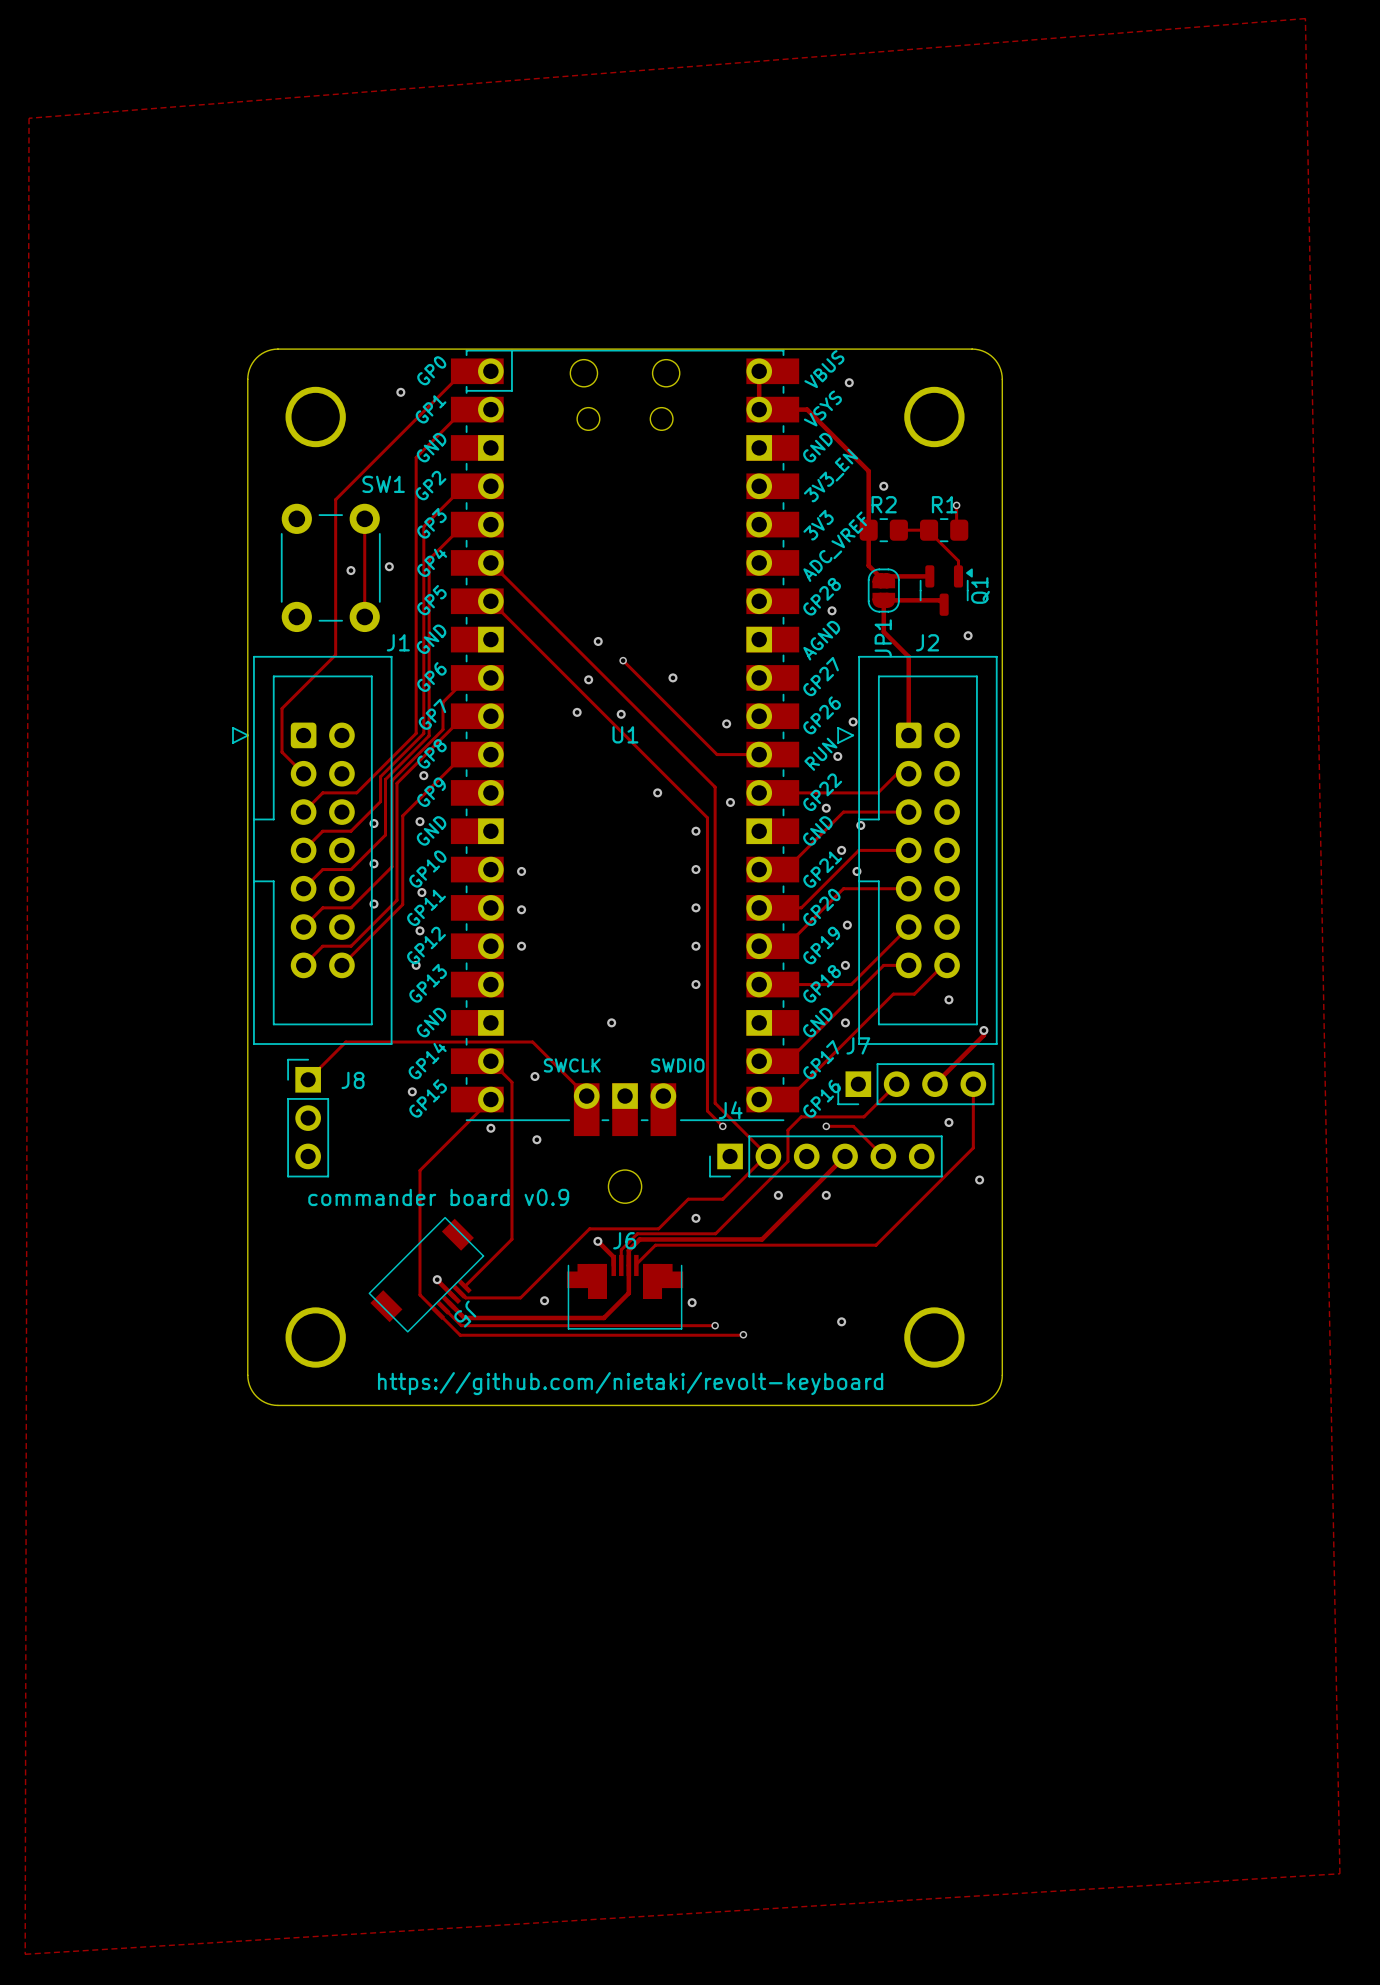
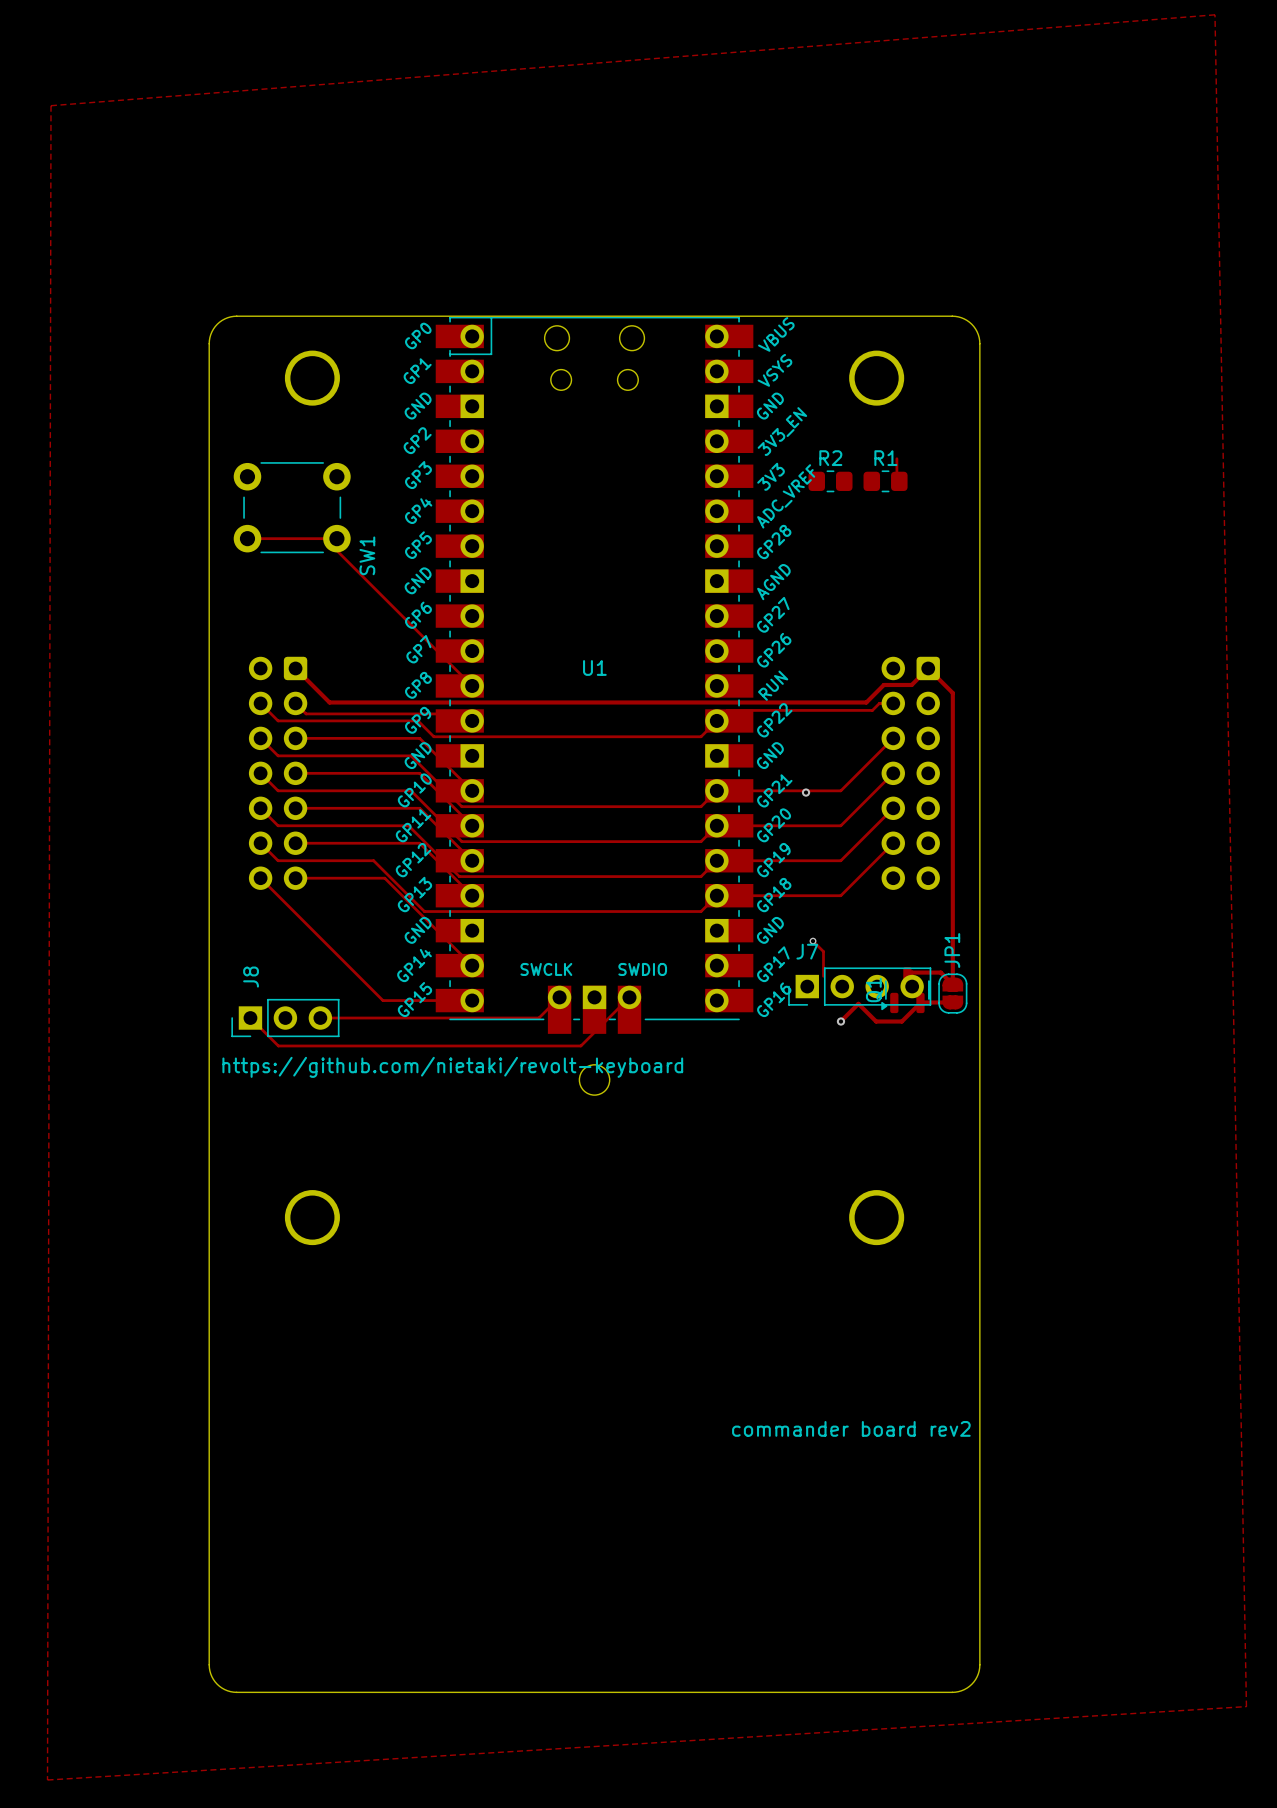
board edge: (277, 349) (264, 352) (256, 357) (250, 366) (247, 379) (247, 1375) (250, 1388) (256, 1396) (267, 1403) (277, 1405) (972, 1405) (988, 1400) (997, 1391) (1002, 1375) (1002, 379) (1000, 369) (993, 357) (985, 352) (972, 349) -> (278, 316) (227, 317) (215, 326) (210, 334) (209, 343) (209, 1664) (210, 1673) (217, 1684) (227, 1690) (236, 1692) (952, 1692) (966, 1688) (977, 1676) (979, 1664) (979, 343) (975, 329) (969, 322) (961, 317) (911, 316)
track: (490, 371) (464, 371) (335, 499) (335, 654) (282, 708) (282, 752) (303, 773) -> none
track: (759, 371) (759, 409) (807, 409) (868, 471) (868, 565) (883, 580) (888, 576) (929, 576) -> none
via: (849, 382) -> none
via: (400, 392) -> none
track: (490, 409) (464, 409) (416, 457) (416, 733) (356, 792) -> (893, 703) (879, 703) (872, 710) (727, 710) (701, 736) (433, 736) (418, 720) (349, 720)
track: (490, 486) (464, 486) (423, 526) (423, 733) (380, 776) (380, 801) (351, 831) -> (716, 790) (701, 806) (461, 806) (411, 755) (344, 755)
via: (883, 486) -> none
via: (956, 505) -> none
track: (364, 518) (364, 616) -> none
track: (490, 524) (464, 524) (429, 559) (429, 735) (385, 779) (385, 835) (351, 869) -> (716, 825) (701, 841) (461, 841) (411, 790) (344, 790)
track: (898, 530) (929, 530) (958, 560) (958, 576) -> none
track: (490, 562) (715, 787) (715, 1103) (768, 1156) (765, 1156) (722, 1199) (688, 1199) (658, 1228) (589, 1228) (520, 1297) (465, 1297) (459, 1291) -> none
via: (389, 566) -> none
SW1 rotation: 0° (330, 567) -> 90° clockwise (292, 507)
via: (351, 570) -> none
JP1 position: (883, 590) -> (952, 993)
Q1 rotation: 0° (946, 590) -> 180° (905, 990)
Q1 position: (946, 590) -> (905, 990)
track: (490, 601) (707, 817) (707, 1111) (722, 1126) -> none
track: (944, 604) (939, 600) (883, 600) (883, 631) (908, 656) (908, 735) -> none
via: (832, 610) -> none
via: (968, 635) -> none
JP1 name position: JP1 (883, 638) -> JP1 (952, 950)
via: (598, 641) -> none
track: (623, 660) (717, 754) (759, 754) -> none
via: (623, 660) -> none
track: (490, 677) (467, 677) (442, 702) (442, 729) (392, 780) (392, 866) (351, 907) -> (716, 860) (701, 876) (459, 876) (408, 825) (344, 825)
via: (672, 677) -> none
via: (588, 679) -> none
via: (577, 712) -> none
via: (621, 714) -> none
track: (490, 716) (464, 716) (396, 783) (396, 900) (351, 946) -> (716, 895) (701, 911) (424, 911) (373, 860) (344, 860)
via: (853, 721) -> none
via: (726, 723) -> none
track: none -> (295, 668) (329, 702) (866, 702) (883, 684) (911, 684) (928, 668) (952, 693) (952, 984) (940, 972) (911, 972) (907, 977)
track: (490, 754) (464, 754) (402, 815) (402, 904) (341, 965) -> (472, 685) (336, 550) (336, 538) (247, 538)
via: (837, 756) -> none
track: none -> (295, 703) (306, 713) (465, 713) (472, 720)
track: (908, 773) (897, 773) (878, 792) (759, 792) -> none
via: (423, 775) -> none
track: (322, 792) (303, 812) -> (318, 720) (278, 720) (260, 703)
via: (657, 792) -> none
via: (730, 802) -> none
via: (826, 808) -> none
track: none -> (295, 738) (419, 738) (472, 790)
track: (908, 812) (843, 812) (786, 869) -> (893, 738) (840, 790) (741, 790)
via: (419, 821) -> none
via: (373, 823) -> none
via: (860, 825) -> none
track: (322, 831) (303, 850) -> (318, 755) (278, 755) (260, 738)
via: (695, 831) -> none
part: none -> (278, 773)
track: none -> (295, 773) (419, 773) (472, 825)
J1: (312, 850) -> none
via: (841, 850) -> none
track: (908, 850) (858, 850) (801, 907) -> (893, 773) (840, 825) (755, 825)
J2: (917, 850) -> none
part: none -> (910, 773)
via: (373, 863) -> none
track: (322, 869) (303, 888) -> (318, 790) (278, 790) (260, 773)
via: (695, 869) -> none
via: (521, 871) -> none
track: none -> (295, 808) (419, 808) (472, 860)
track: (908, 888) (843, 888) (786, 946) -> (893, 808) (840, 860) (741, 860)
via: (421, 892) -> none
via: (373, 904) -> none
track: (322, 907) (303, 927) -> (318, 825) (278, 825) (260, 808)
via: (695, 907) -> none
via: (521, 909) -> none
via: (847, 925) -> none
track: none -> (295, 843) (419, 843) (472, 895)
track: (908, 927) (851, 984) -> (893, 843) (840, 895) (800, 895)
via: (419, 930) -> none
track: (322, 946) (303, 965) -> (318, 860) (278, 860) (260, 843)
via: (521, 946) -> none
via: (695, 946) -> none
via: (416, 965) -> none
via: (845, 965) -> none
track: (908, 965) (883, 965) (787, 1061) (759, 1061) -> none
track: (947, 965) (943, 965) (914, 994) (893, 994) (787, 1099) (759, 1099) -> none
via: (695, 984) -> none
via: (948, 999) -> none
via: (611, 1022) -> none
via: (845, 1022) -> none
track: (983, 1030) (983, 1035) (935, 1084) -> none
via: (983, 1030) -> none
track: none -> (813, 941) (823, 951) (823, 976)
via: none -> (813, 941)
track: (490, 1061) (511, 1082) (511, 1239) (464, 1286) -> (472, 965) (384, 878) (295, 878)
via: (534, 1076) -> none
track: (308, 1079) (345, 1042) (532, 1042) (586, 1096) -> (320, 1018) (538, 1018) (559, 997)
track: (896, 1084) (863, 1116) (801, 1116) (787, 1130) (787, 1161) (715, 1233) (637, 1233) (621, 1249) (621, 1265) -> none
track: (973, 1084) (973, 1147) (876, 1245) (655, 1245) (636, 1265) -> none
via: (412, 1091) -> none
track: none -> (629, 997) (580, 1045) (278, 1045) (250, 1018)
track: (490, 1099) (419, 1170) (419, 1294) (460, 1335) (743, 1334) -> (472, 1000) (382, 1000) (260, 878)
track: none -> (952, 1002) (920, 1002) (901, 1021) (876, 1021) (858, 1003) (840, 1021)
J8 rotation: 0° (308, 1118) -> 90° counterclockwise (285, 1018)
via: none -> (840, 1021)
via: (948, 1122) -> none
via: (722, 1126) -> none
track: (826, 1126) (853, 1126) (883, 1156) -> none
via: (826, 1126) -> none
via: (490, 1128) -> none
via: (536, 1139) -> none
J4: (825, 1156) -> none
track: (845, 1156) (762, 1239) (639, 1239) (628, 1250) (628, 1293) (603, 1318) (464, 1318) (448, 1302) -> none
via: (979, 1180) -> none
via: (778, 1195) -> none
via: (826, 1195) -> none
text: commander board v0.9 (438, 1197) -> none
via: (695, 1218) -> none
track: (597, 1241) (613, 1257) (613, 1265) -> none
via: (597, 1241) -> none
J5: (426, 1274) -> none
track: (437, 1279) (454, 1297) -> none
via: (437, 1279) -> none
J6: (625, 1292) -> none
via: (544, 1300) -> none
via: (692, 1302) -> none
track: (443, 1307) (461, 1325) (715, 1325) -> none
via: (841, 1321) -> none
via: (715, 1325) -> none
via: (743, 1334) -> none
text position: https://github.com/nietaki/revolt-keyboard (630, 1383) -> https://github.com/nietaki/revolt-keyboard (452, 1067)
text: none -> commander board rev2 (851, 1428)

